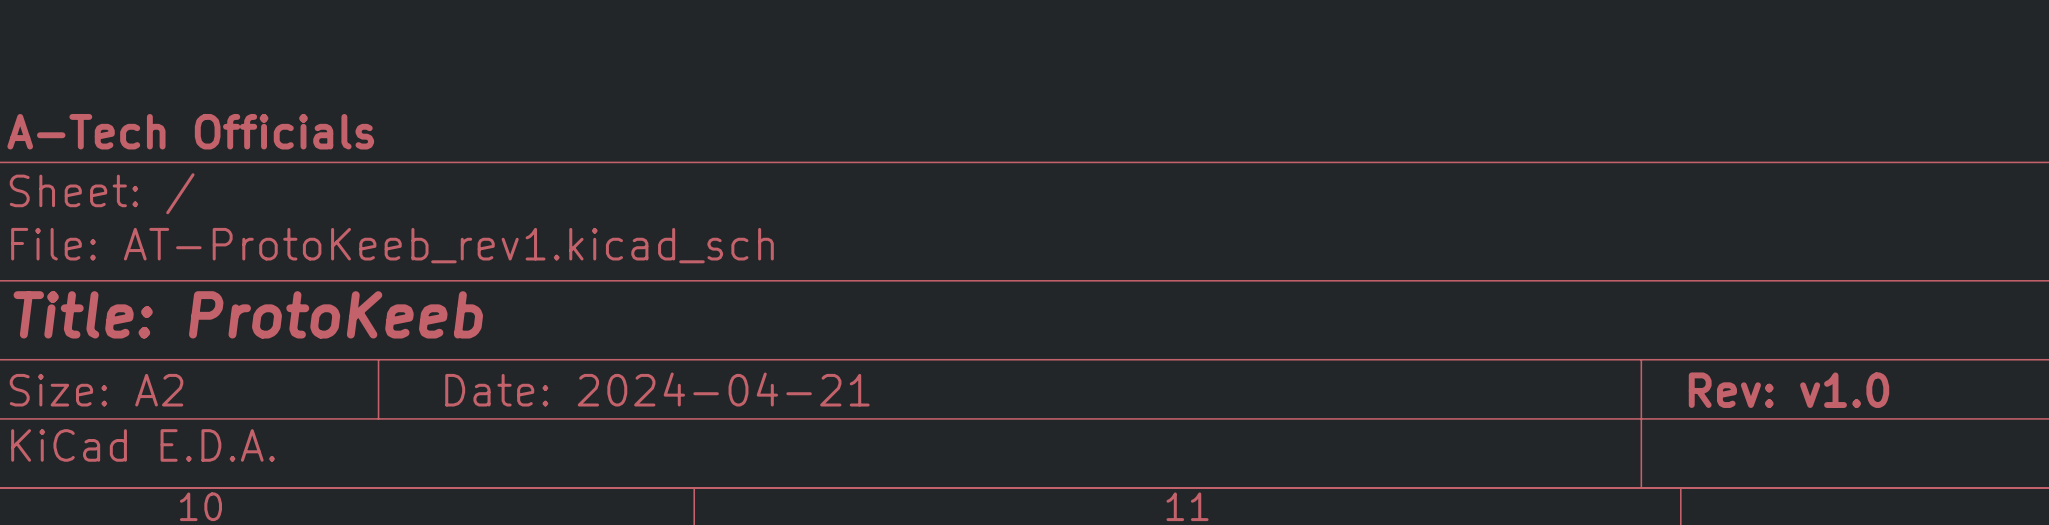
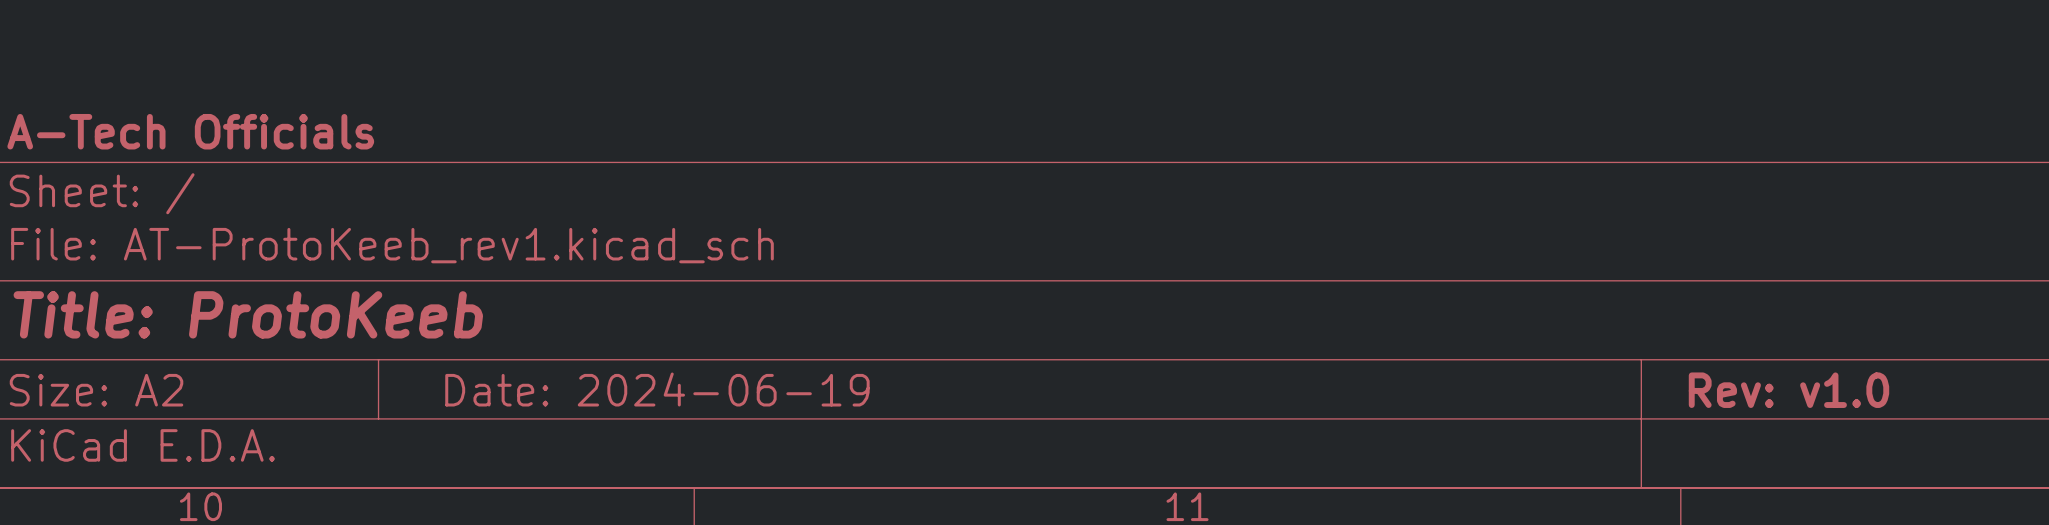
title block: Date: 2024-04-21 (657, 389) -> Date: 2024-06-19 (657, 389)

